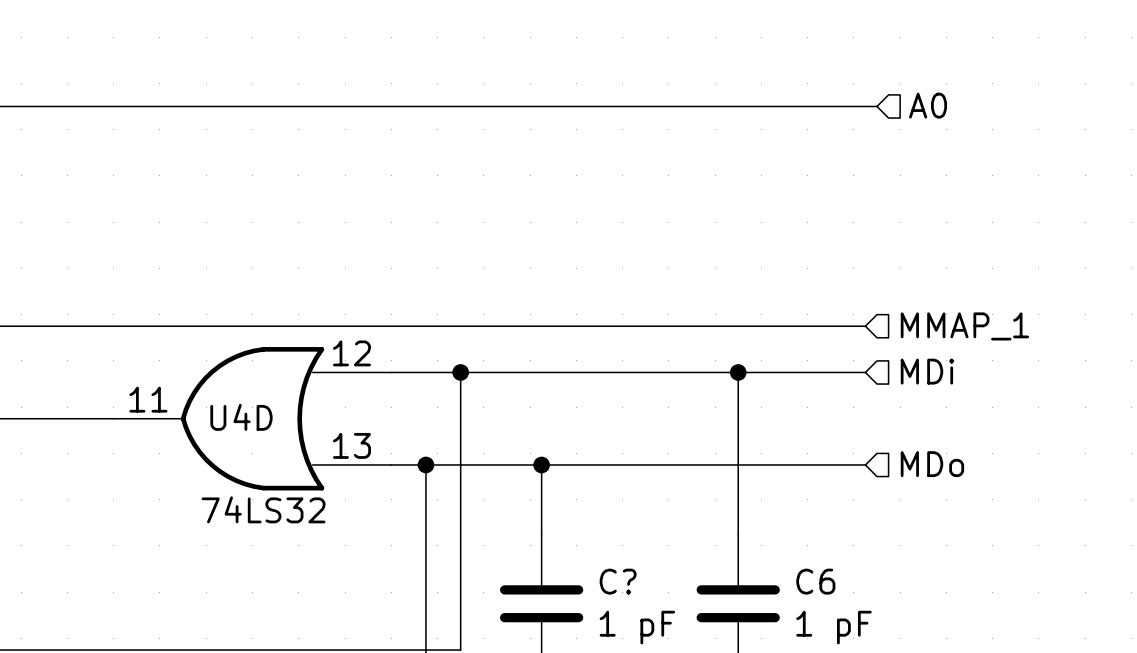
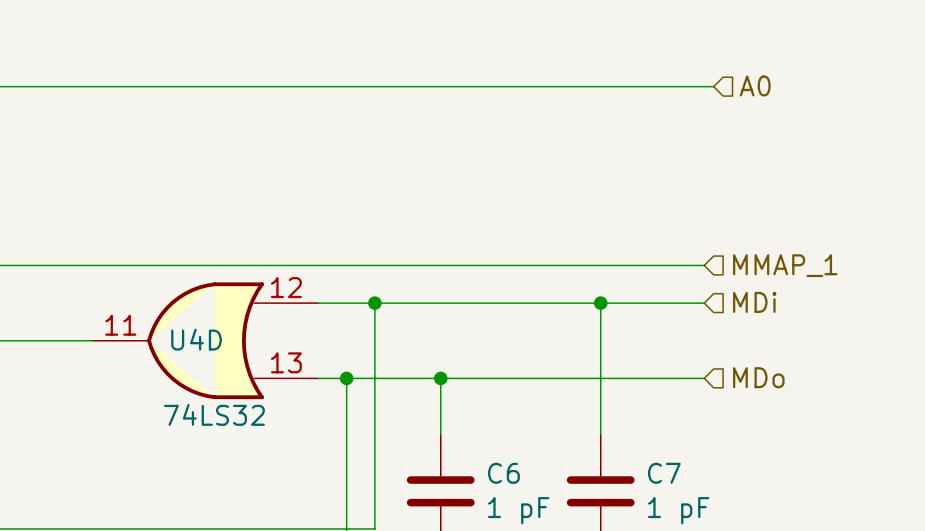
C? name: C? (618, 581) -> C6 (503, 473)
C6 name: C6 (815, 581) -> C7 (664, 473)

